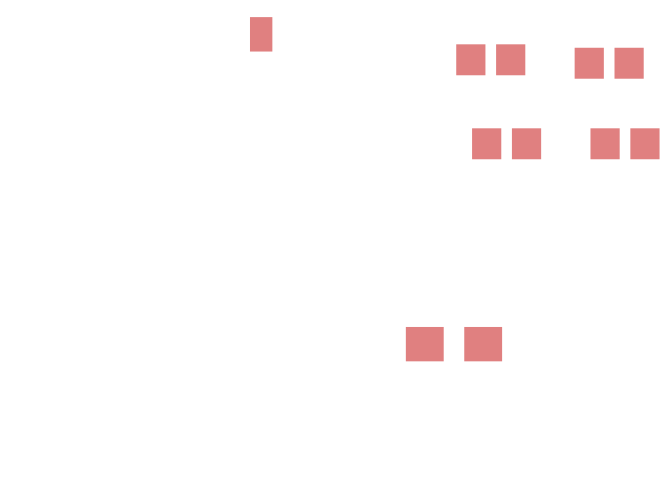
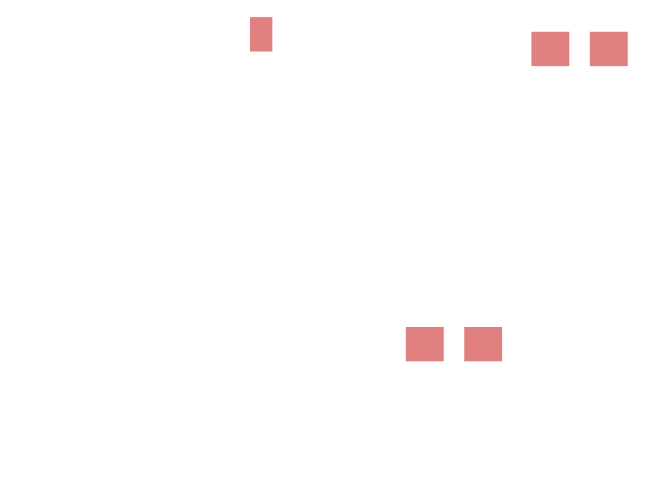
part footprint: [574, 47, 644, 79] -> [531, 31, 628, 67]
part: (490, 59) -> none
part: (506, 143) -> none
part: (625, 143) -> none

